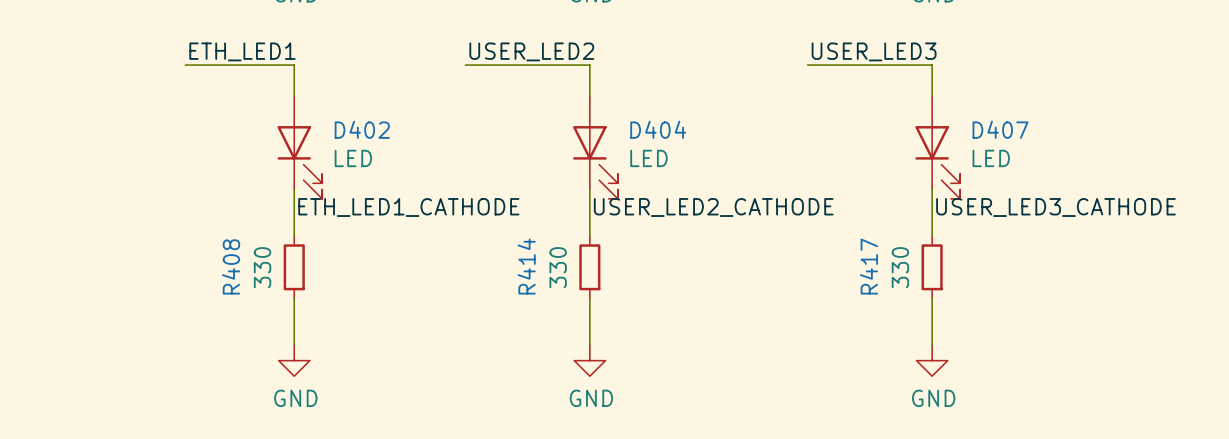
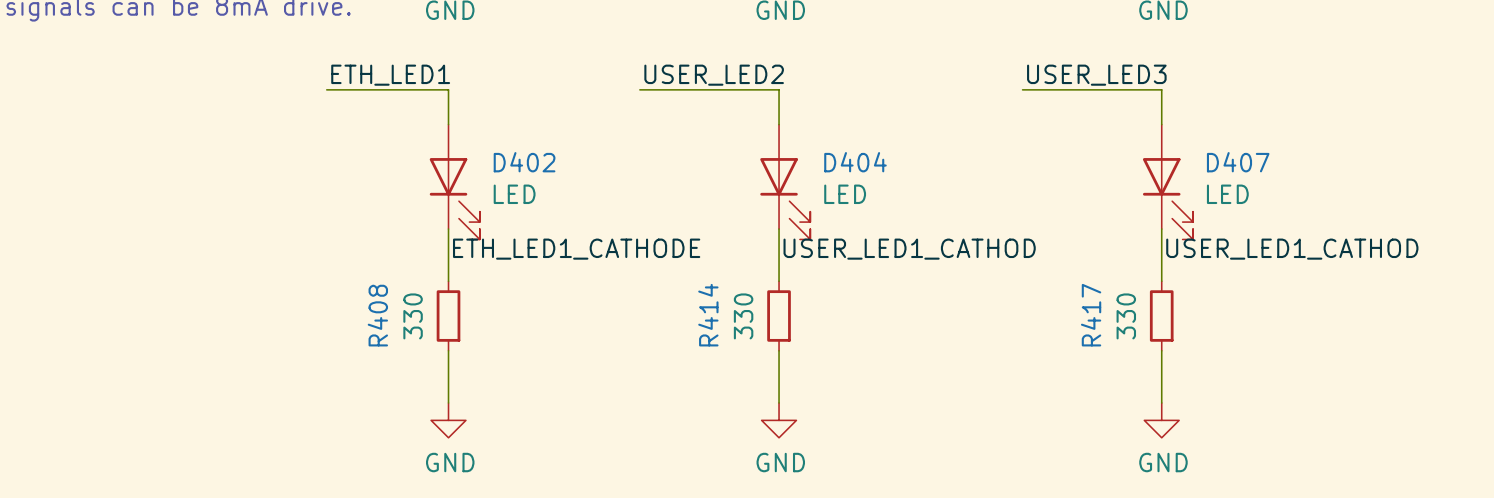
label: USER_LED2_CATHODE (713, 207) -> USER_LED1_CATHOD (909, 249)
label: USER_LED3_CATHODE (1055, 207) -> USER_LED1_CATHOD (1292, 249)

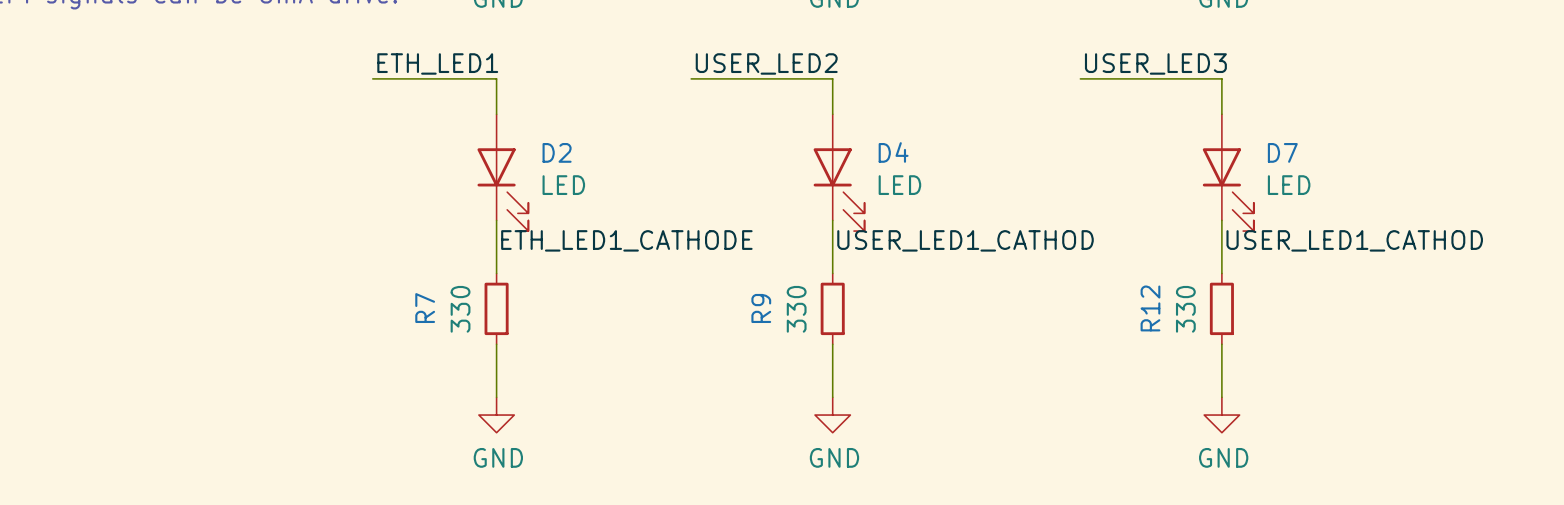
D402 name: D402 (524, 162) -> D2 (557, 152)
D404 name: D404 (855, 162) -> D4 (893, 152)
D407 name: D407 (1238, 162) -> D7 (1282, 152)
R408 name: R408 (377, 315) -> R7 (425, 308)
R414 name: R414 (708, 315) -> R9 (761, 308)
R417 name: R417 (1091, 315) -> R12 (1150, 308)

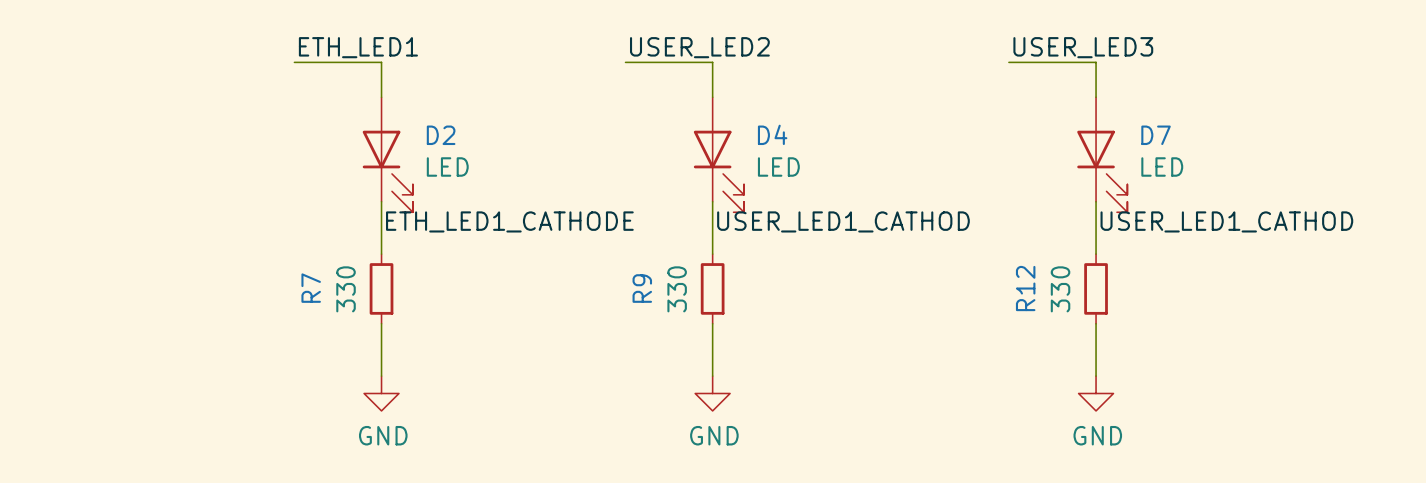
label position: ETH_LED1 (437, 63) -> ETH_LED1 (358, 47)
label position: USER_LED2 (766, 63) -> USER_LED2 (699, 47)
label position: USER_LED3 (1155, 63) -> USER_LED3 (1083, 47)
wire: (372, 78) (408, 78) -> none
wire: (691, 78) (744, 78) -> none
wire: (1080, 78) (1133, 78) -> none

